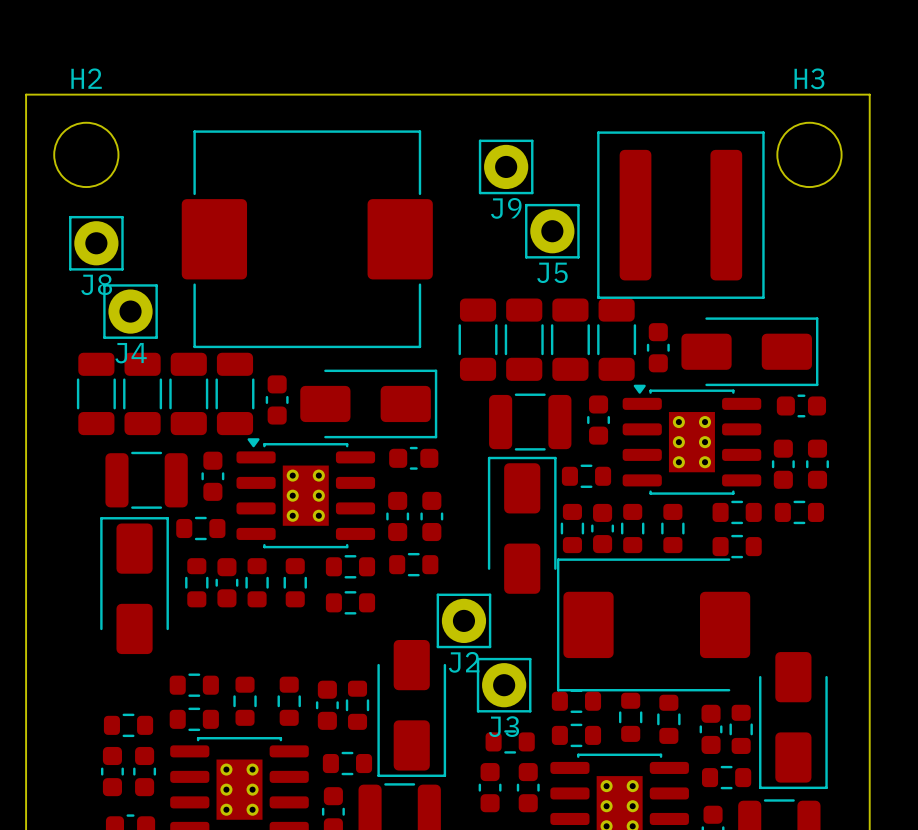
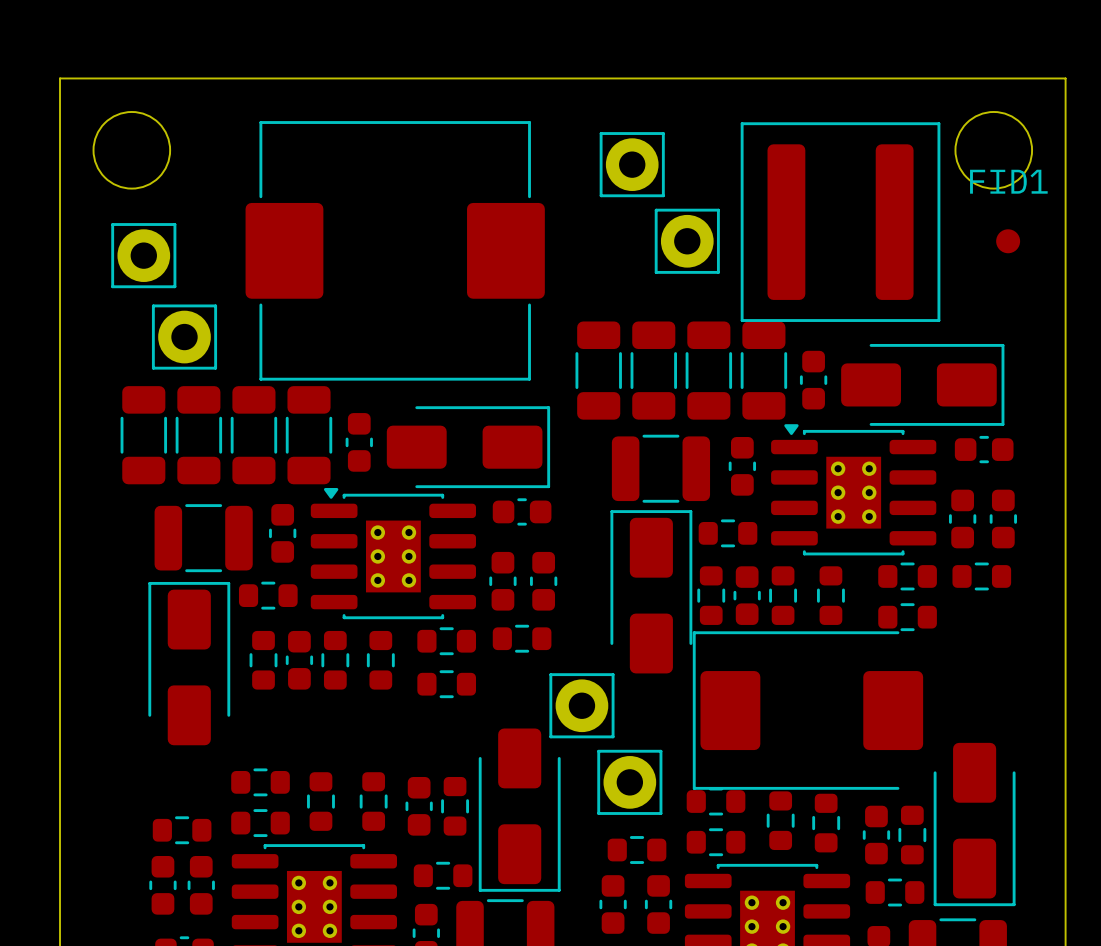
H2 name: H2 (86, 78) -> none
H3 name: H3 (809, 78) -> none
J9 name: J9 (506, 208) -> none
FID1: none -> (1008, 241)
J5 name: J5 (552, 272) -> none
J8 name: J8 (96, 284) -> none
J4 name: J4 (131, 353) -> none
J2 name: J2 (464, 662) -> none
J3 name: J3 (504, 726) -> none

